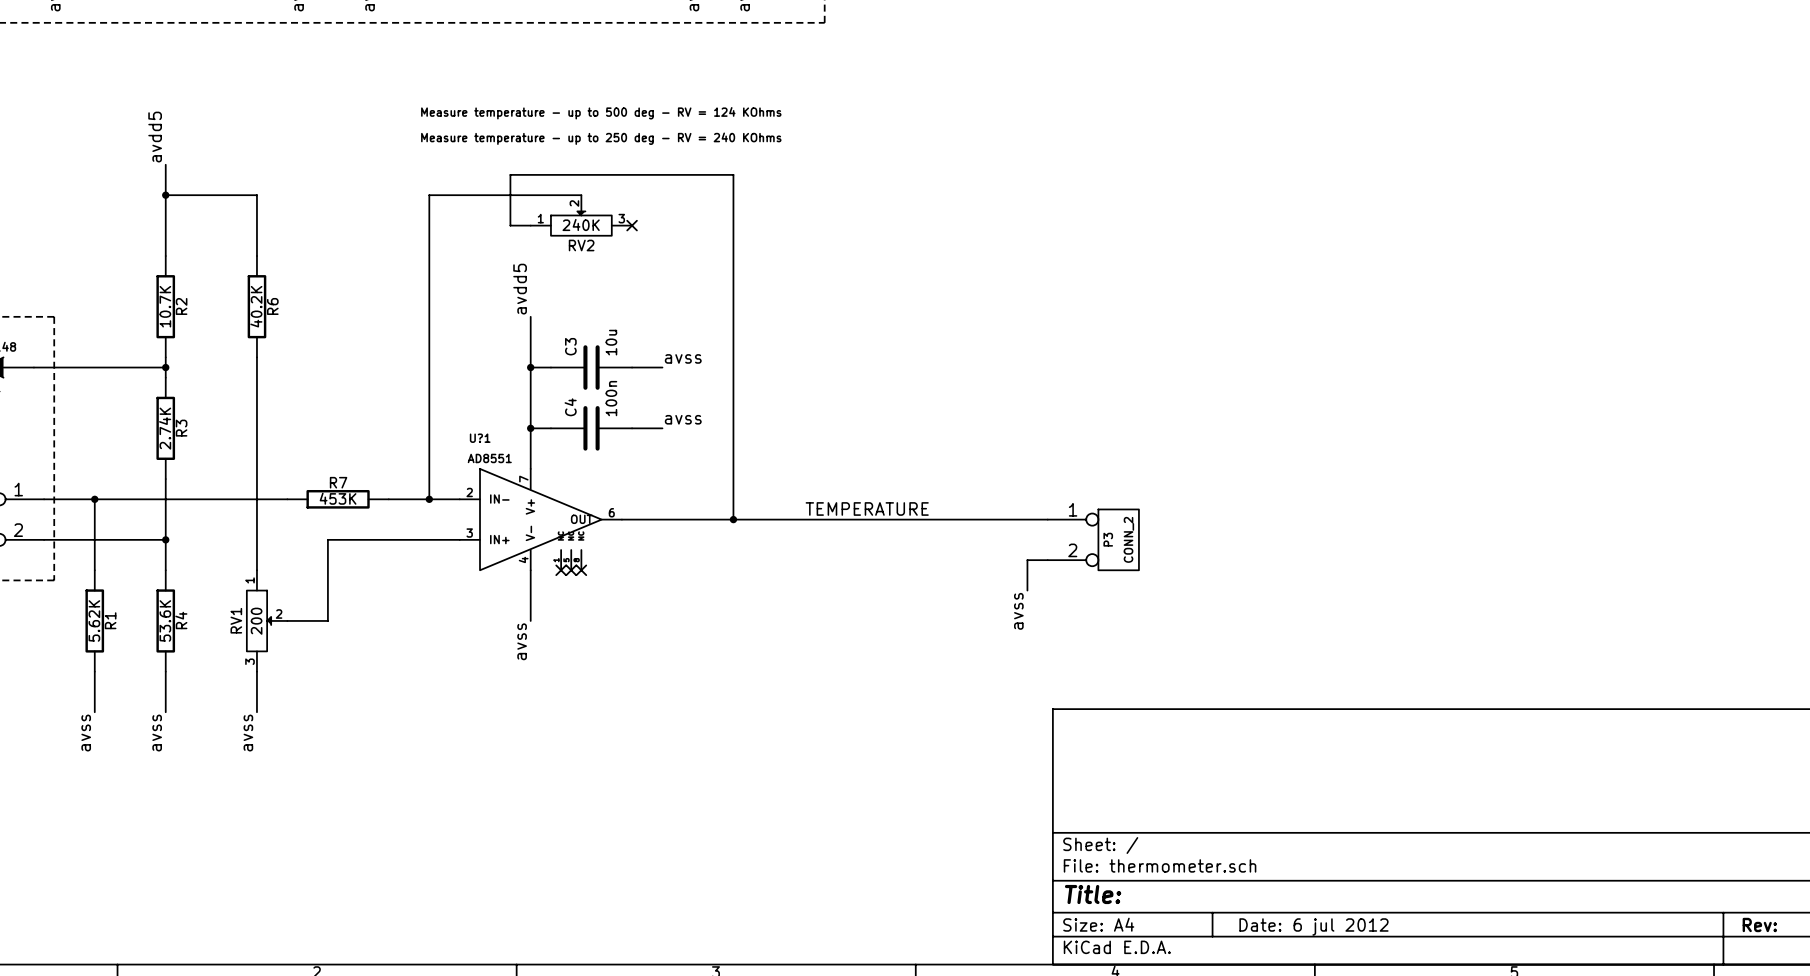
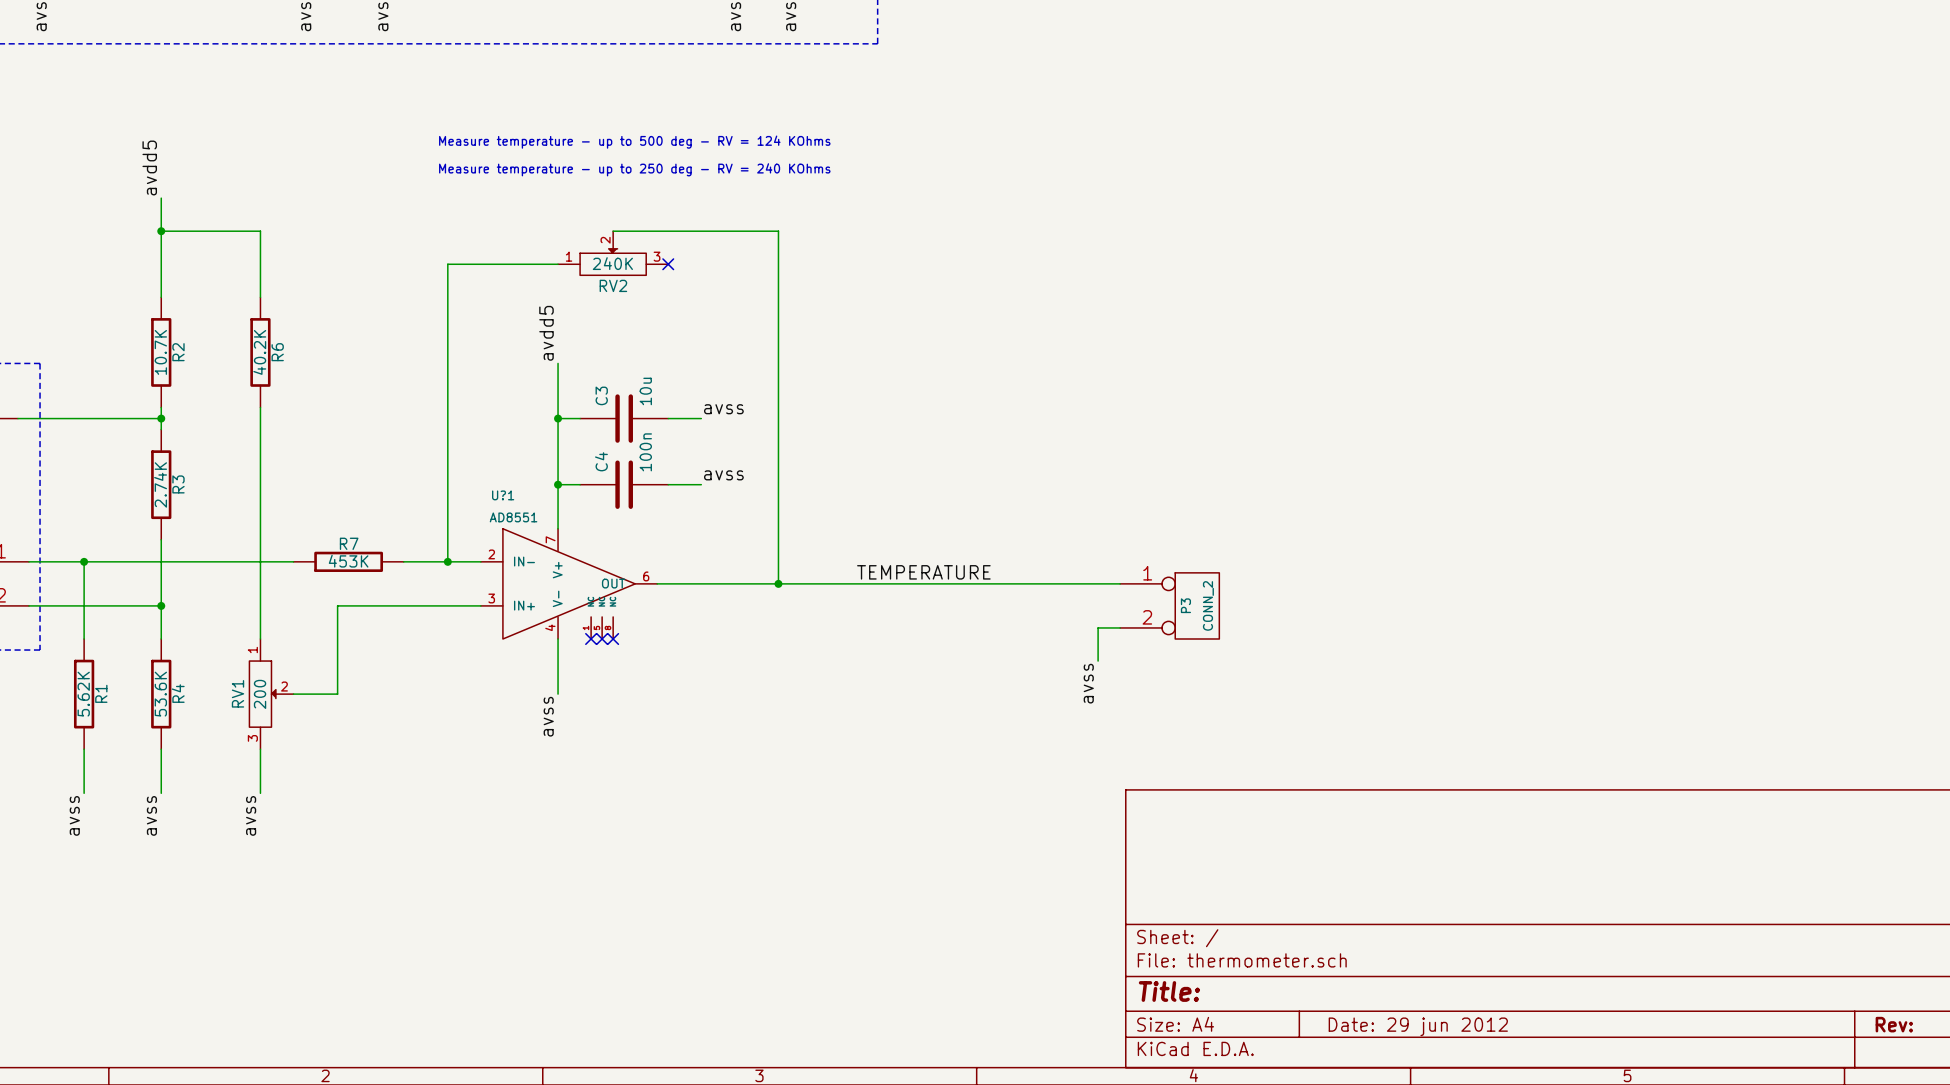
wire: (581, 195) (429, 195) (429, 225) -> (535, 264) (447, 264)
wire: (733, 195) (733, 174) (510, 174) (510, 225) -> (778, 231) (613, 231)
title block: Date: 6 jul 2012 (1313, 926) -> Date: 29 jun 2012 (1418, 1026)

